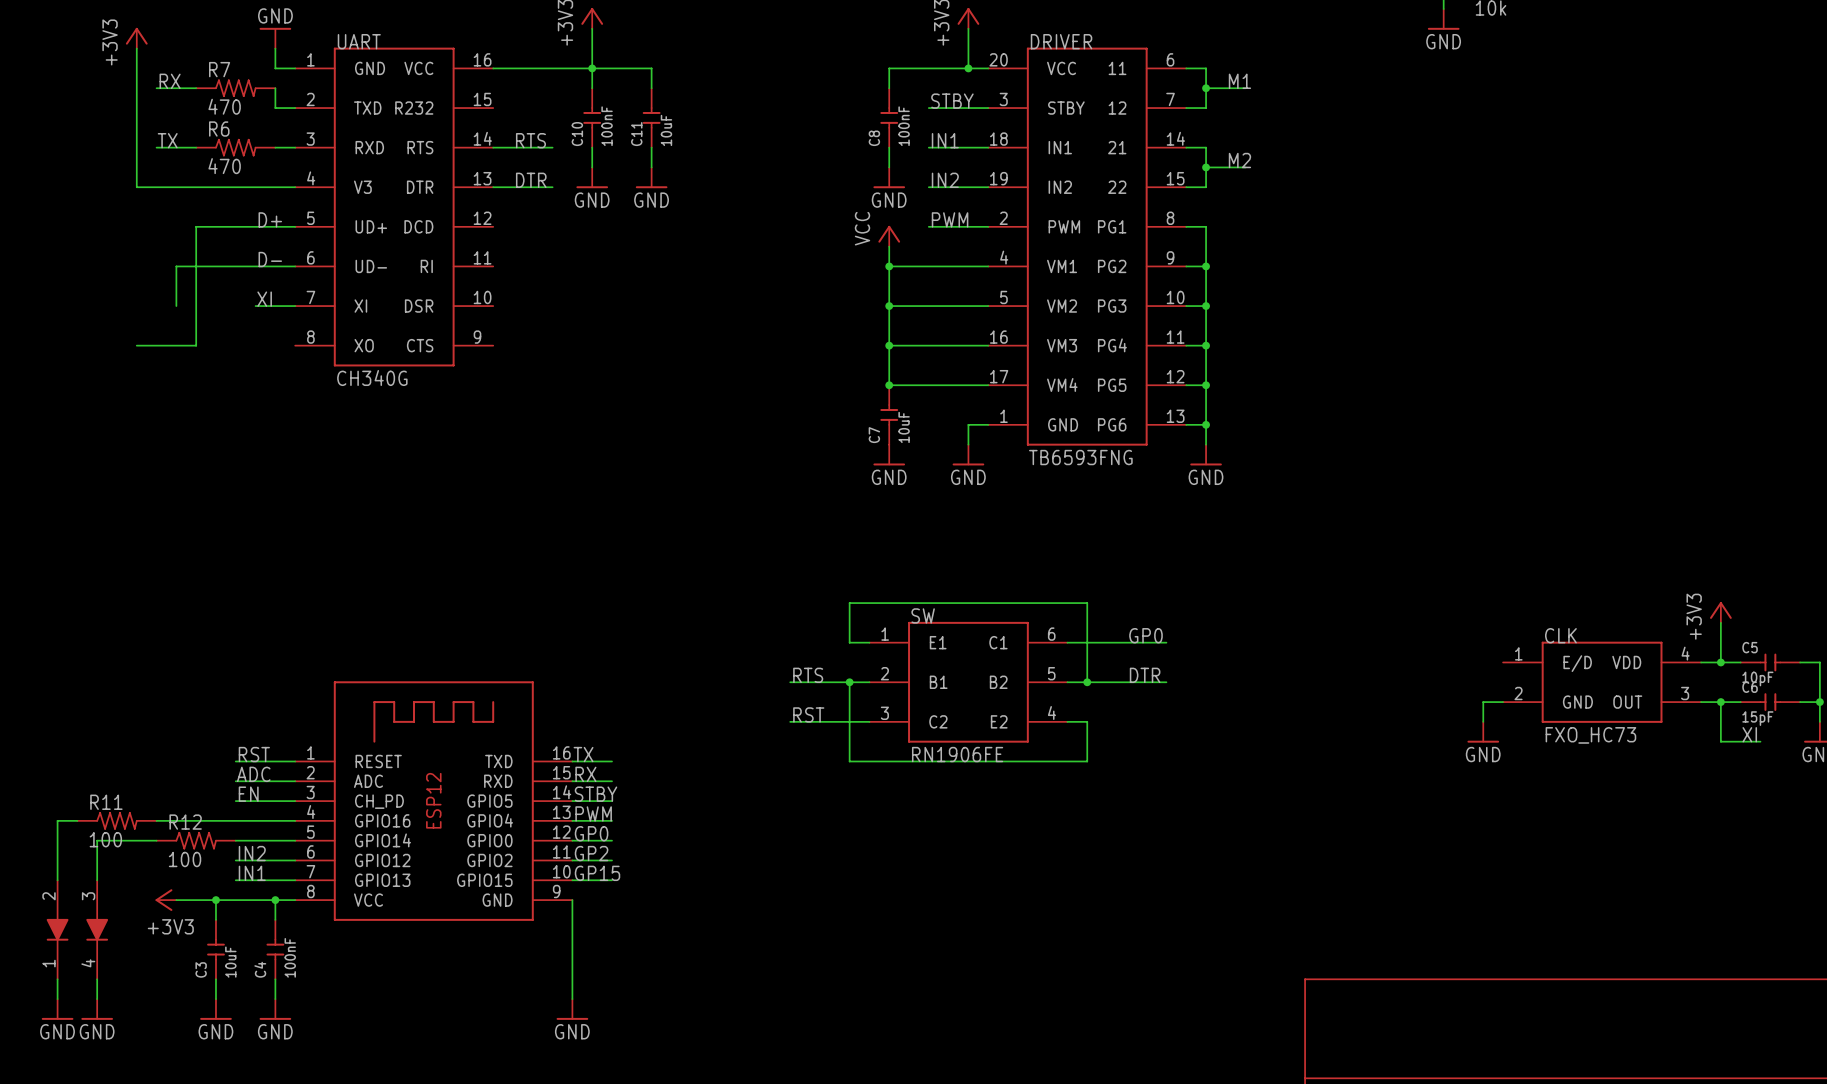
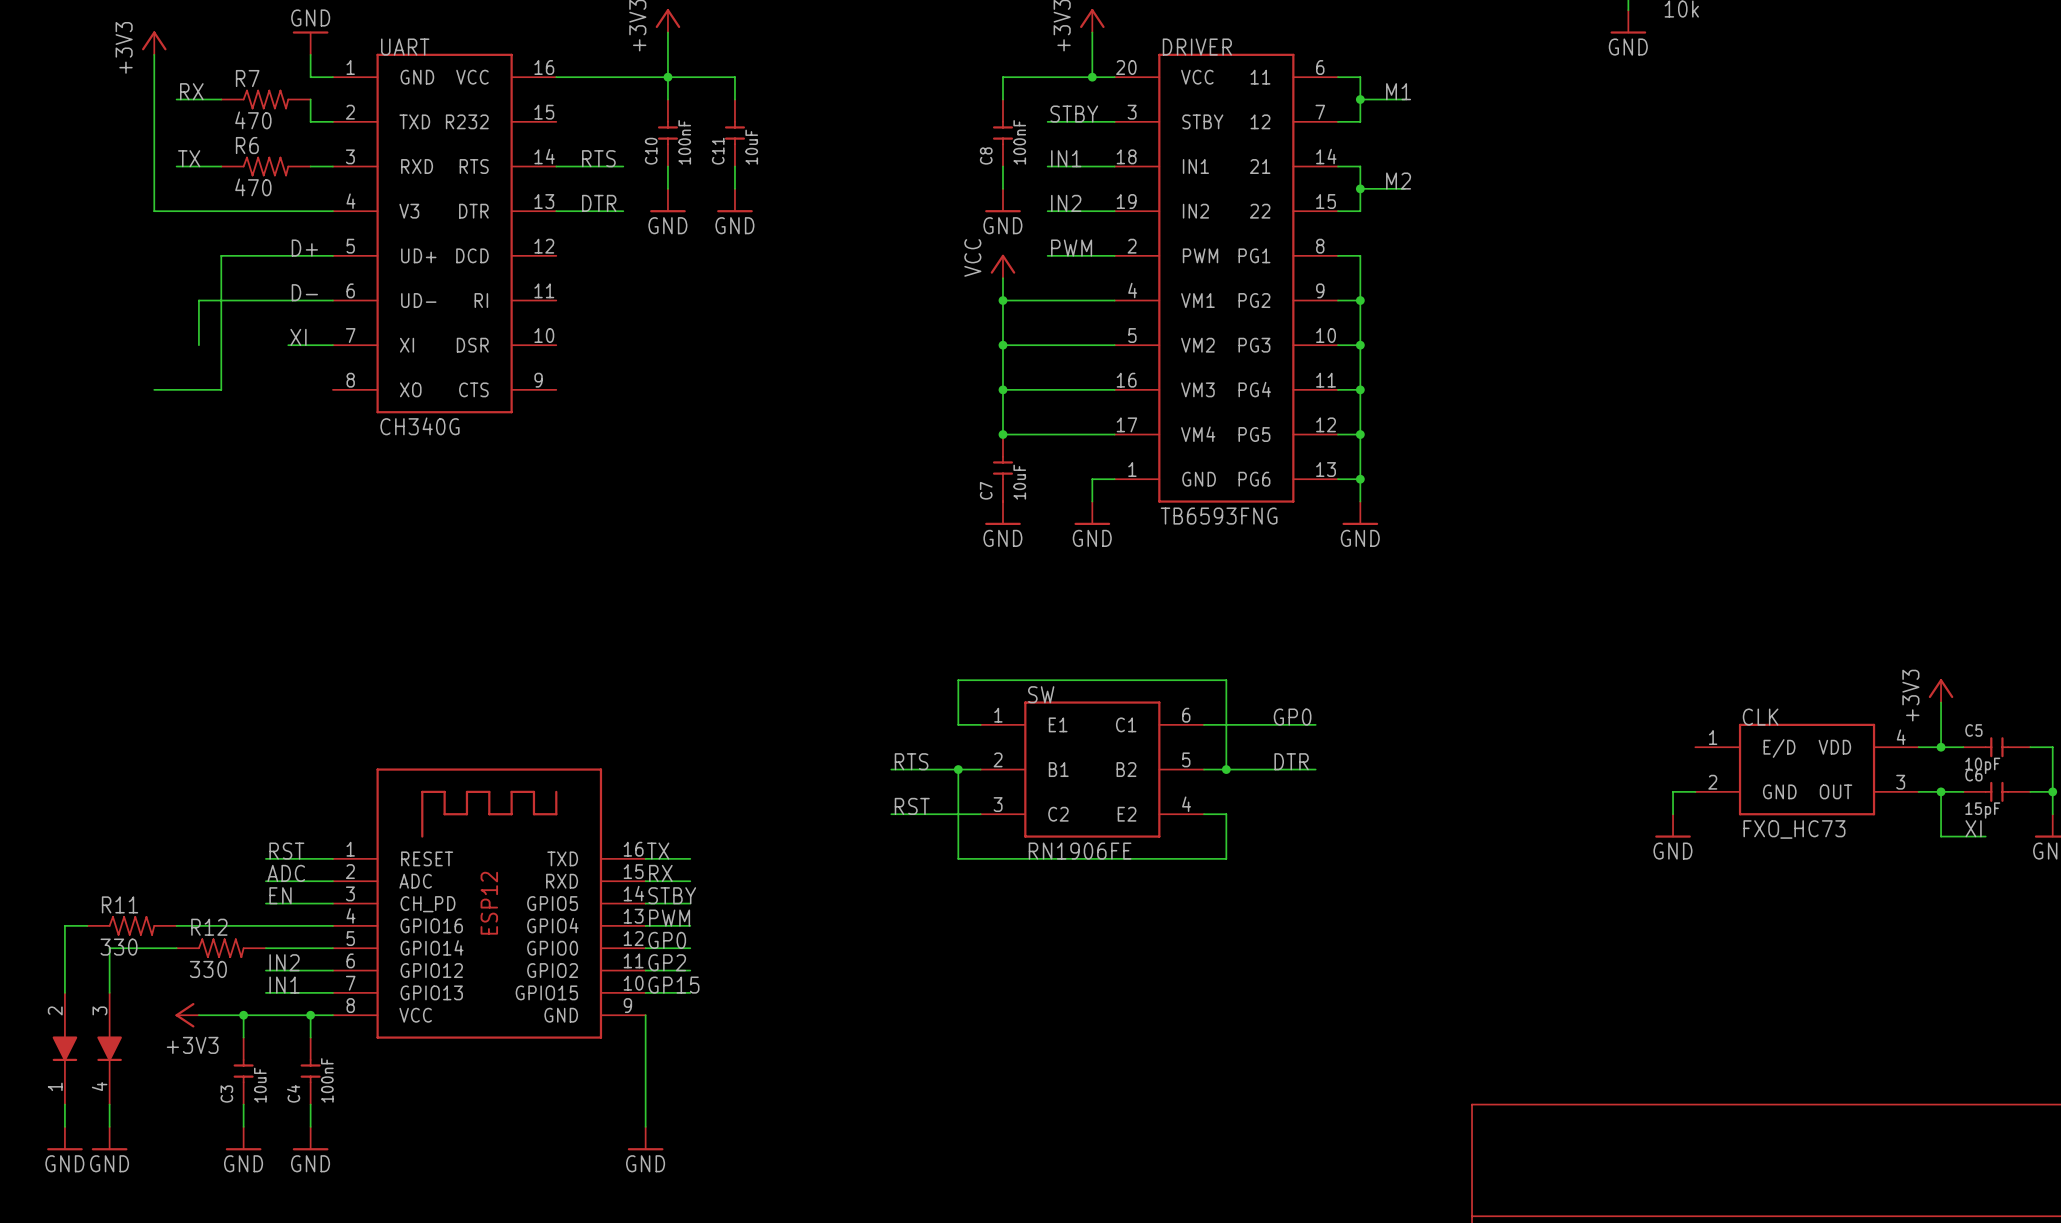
R11 value: 100 (105, 839) -> 330 (119, 947)
R12 value: 100 (185, 859) -> 330 (208, 969)

